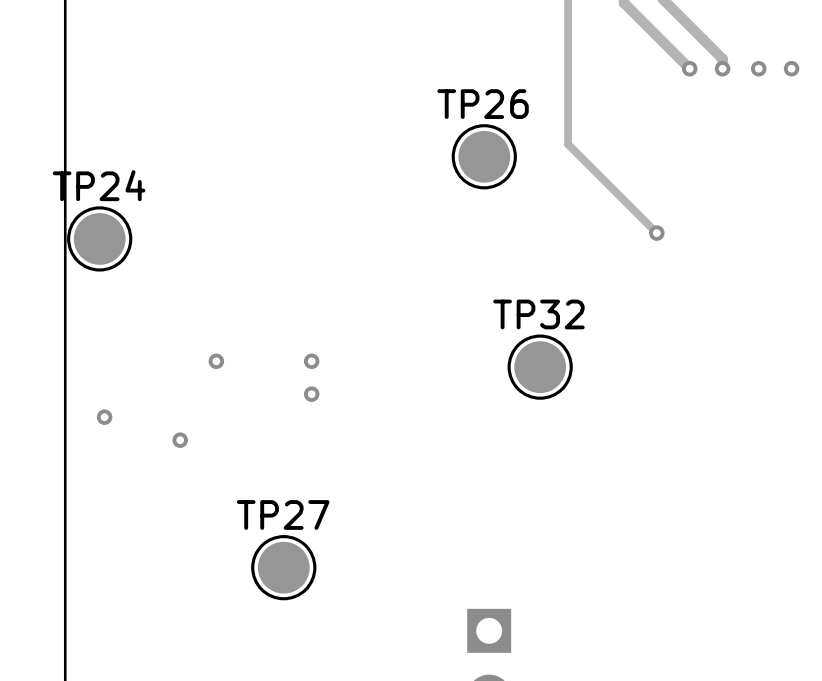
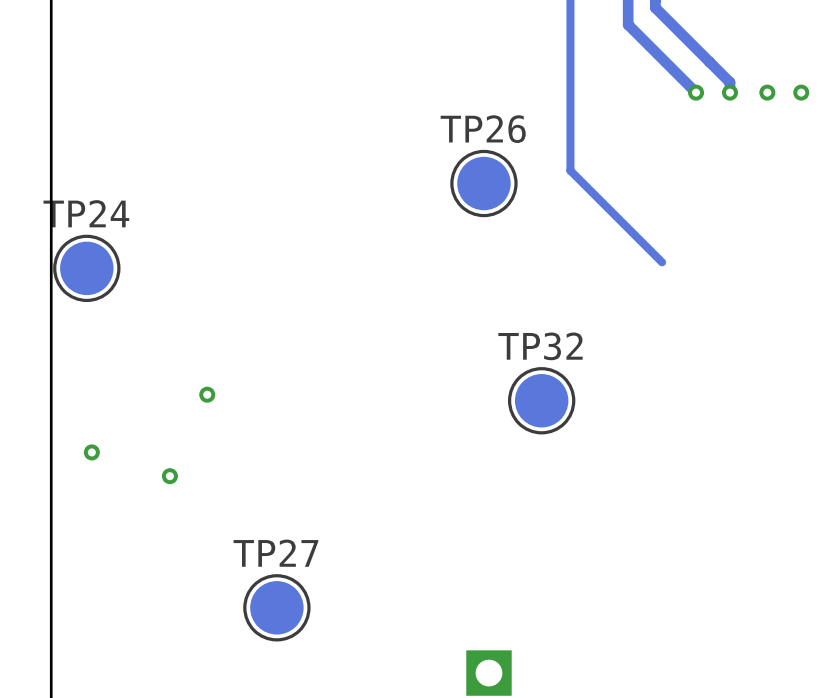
via: (656, 233) -> none
via: (311, 361) -> none
via: (311, 394) -> none

